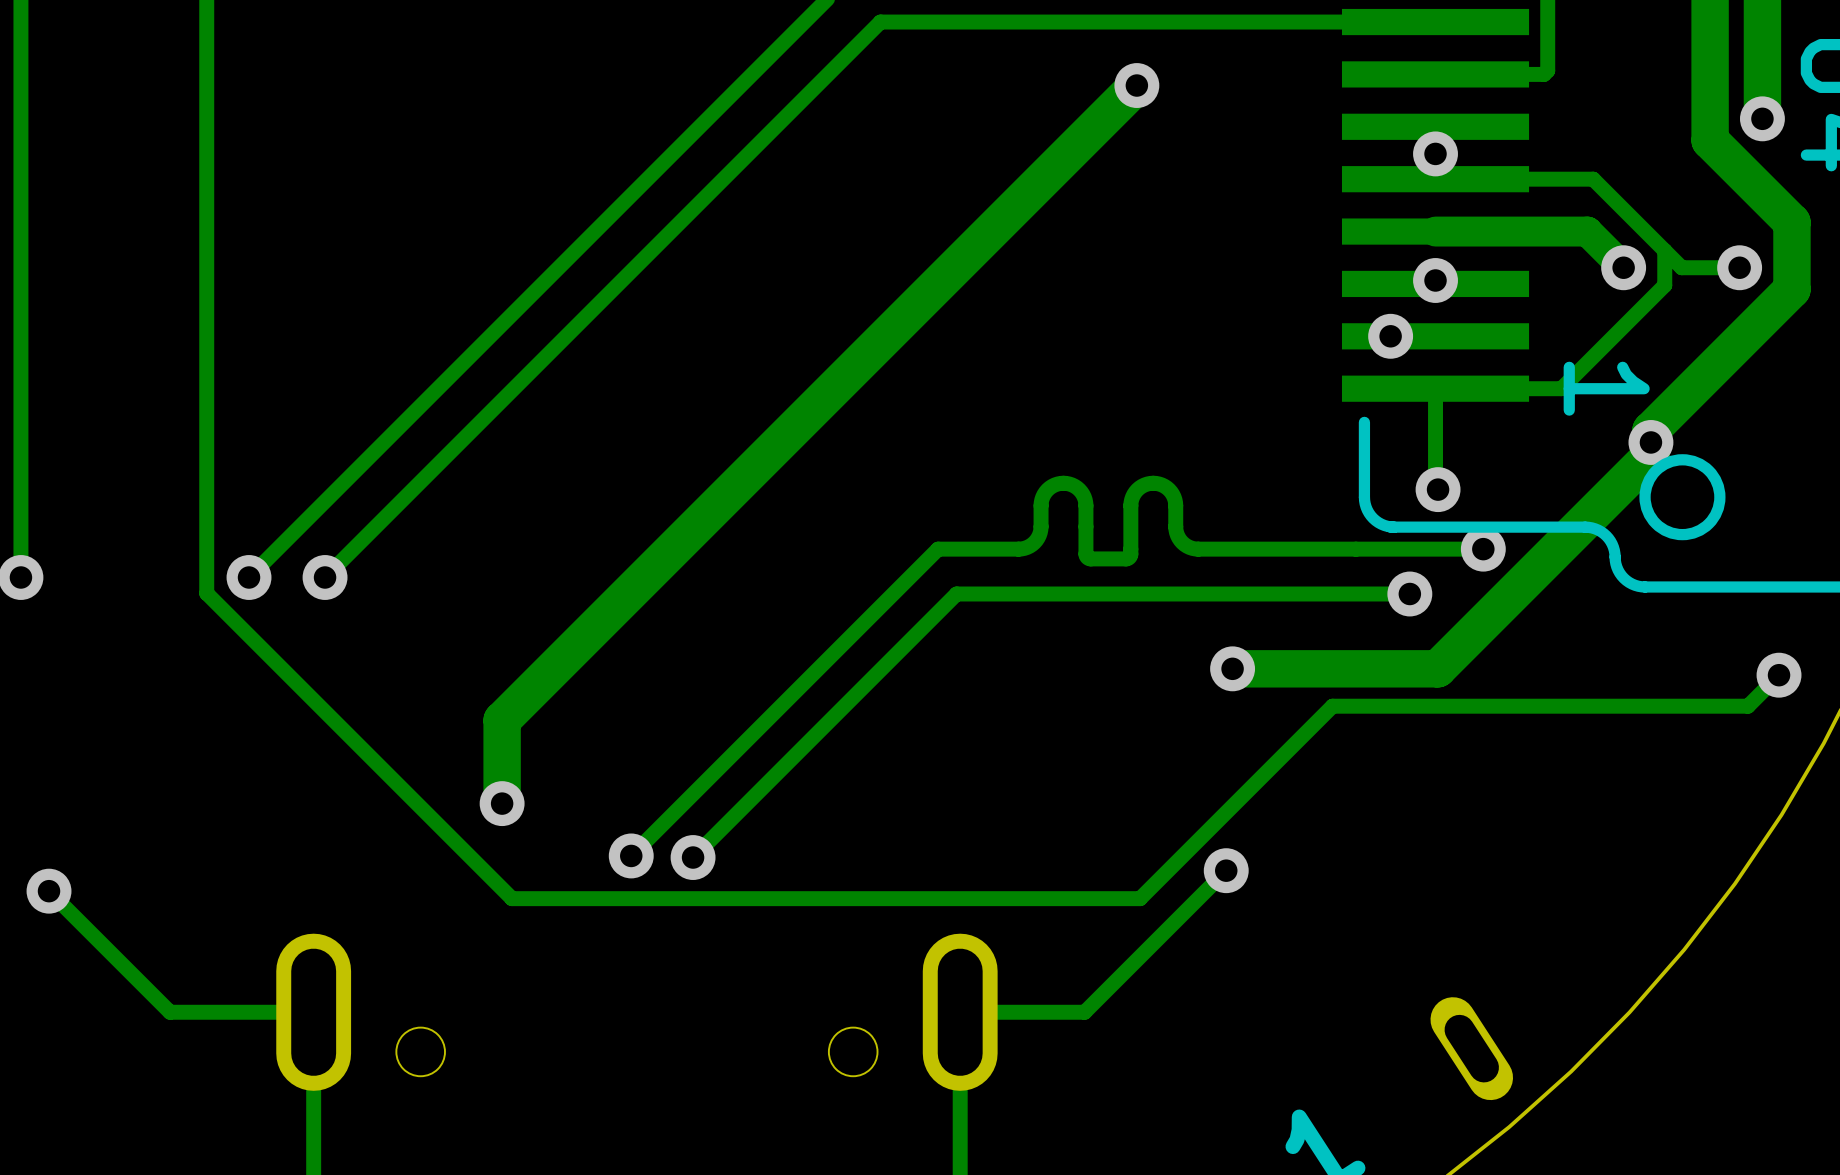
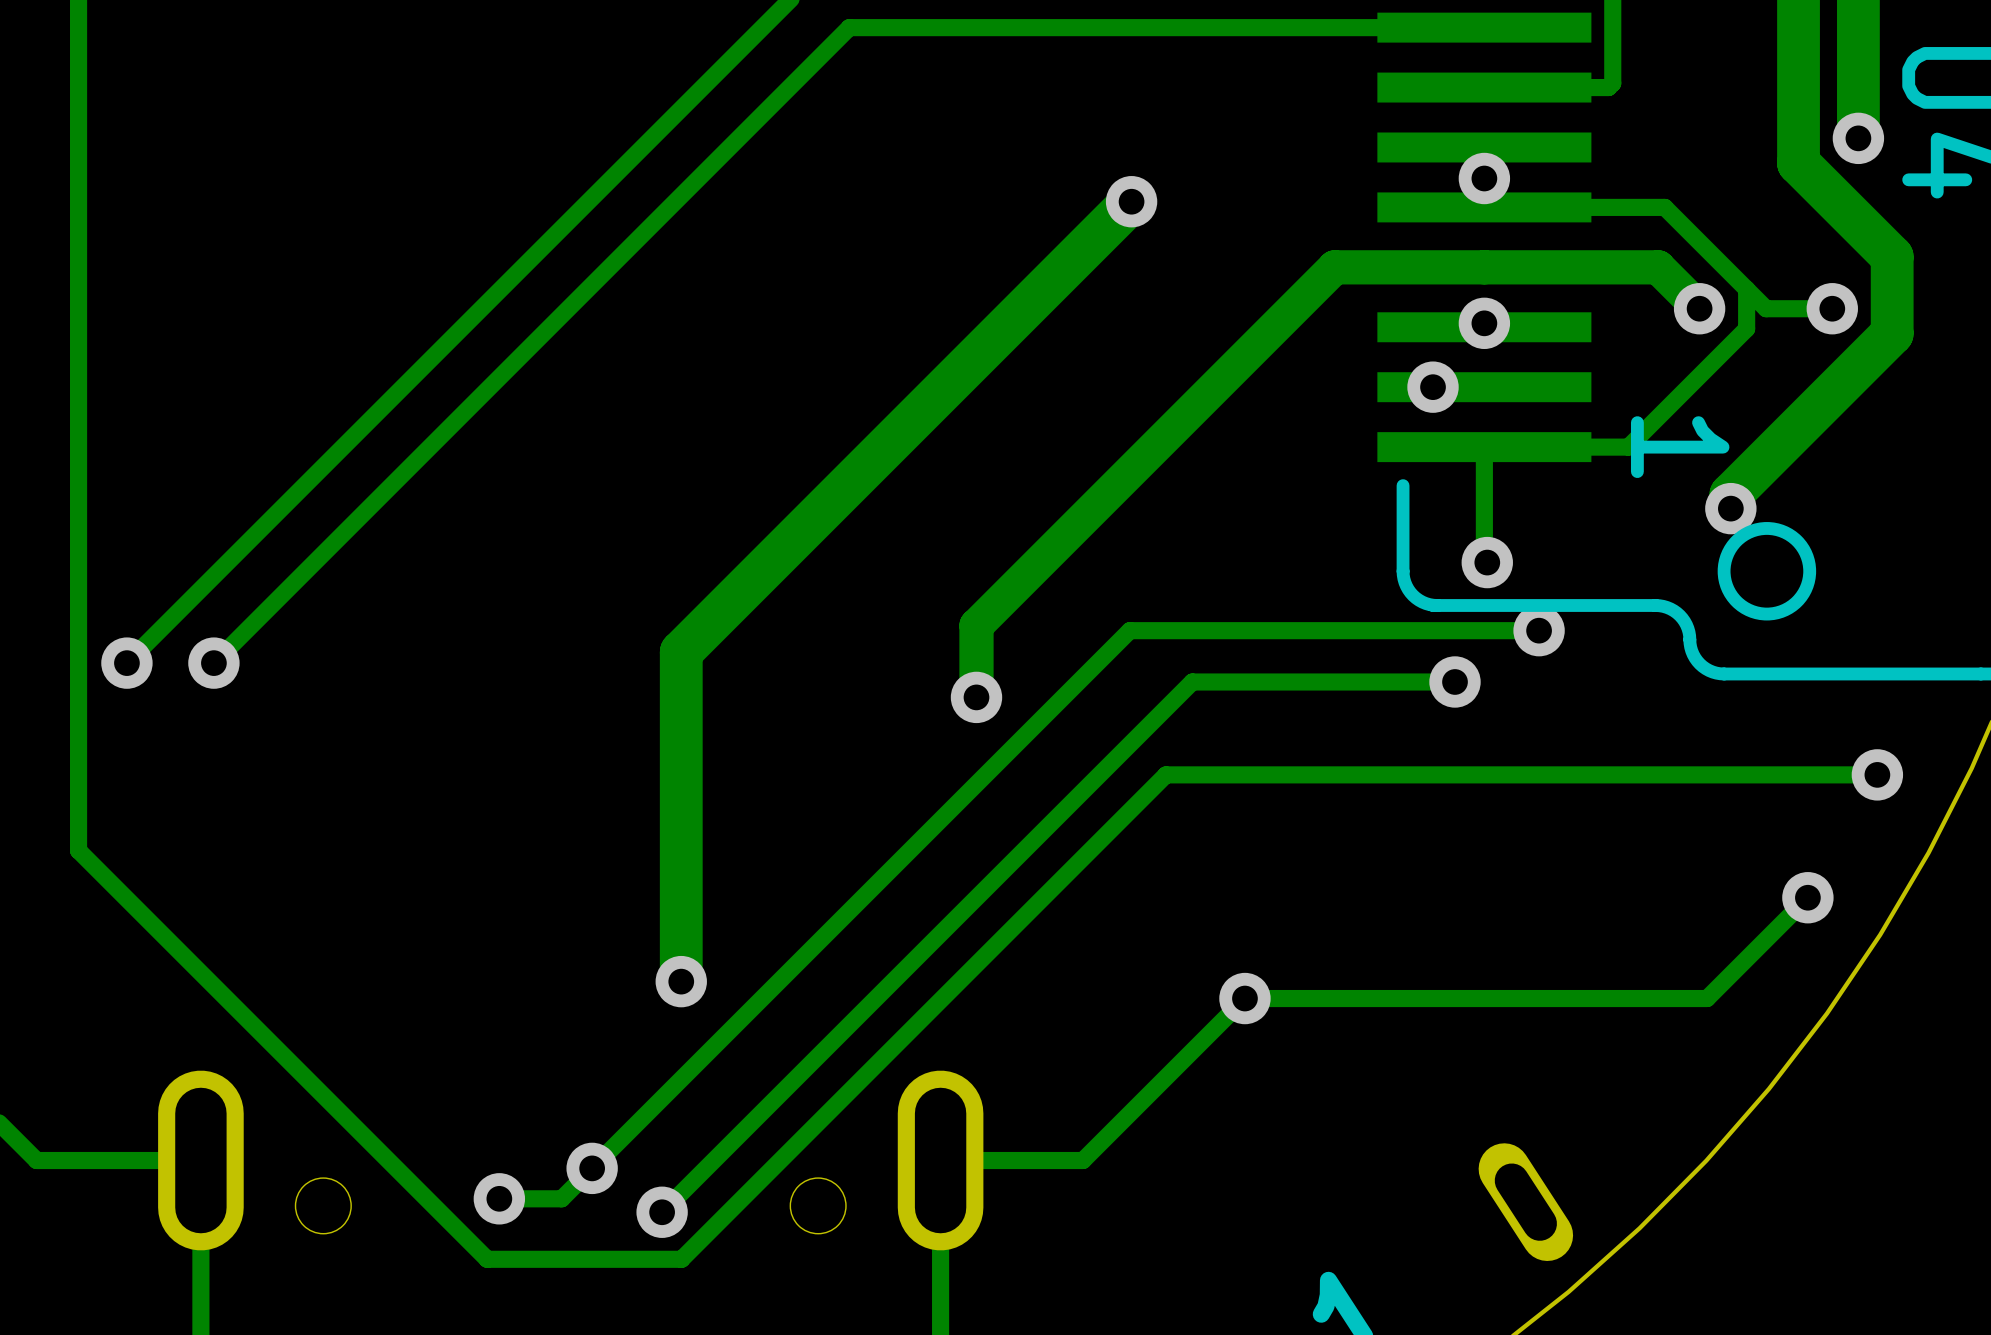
track: (1136, 85) (502, 720) (502, 803) -> none
via position: (1136, 85) -> (1131, 201)
track: none -> (1131, 201) (681, 652) (681, 981)
track: none -> (1484, 267) (1334, 267) (976, 625) (976, 697)
track: (1650, 442) (1650, 455) (1437, 668) (1232, 668) -> none
track: (1198, 549) (1184, 544) (1177, 535) (1175, 502) (1171, 492) (1161, 484) (1150, 483) (1139, 487) (1131, 499) (1129, 557) (1125, 558) (1088, 558) (1085, 554) (1085, 505) (1082, 494) (1077, 487) (1069, 484) (1060, 483) (1052, 486) (1045, 492) (1041, 499) (1040, 529) (1034, 542) (1021, 548) (938, 549) (631, 855) -> (1212, 630) (1129, 630) (561, 1198) (499, 1198)
track: (206, 593) (512, 898) (1140, 898) (1332, 706) (1748, 706) (1779, 675) -> (78, 681) (78, 850) (487, 1259) (681, 1259) (1166, 774) (1877, 774)
track: (1180, 593) (956, 593) (693, 857) -> (1192, 681) (662, 1212)
via: none -> (976, 697)
via: (1232, 668) -> none
track: none -> (1807, 897) (1707, 998) (1244, 998)
via: none -> (1807, 897)
via: (502, 803) -> none
via: (631, 855) -> none
via position: (693, 857) -> (681, 981)
via: none -> (592, 1168)
via: none -> (499, 1198)
via: none -> (662, 1212)

